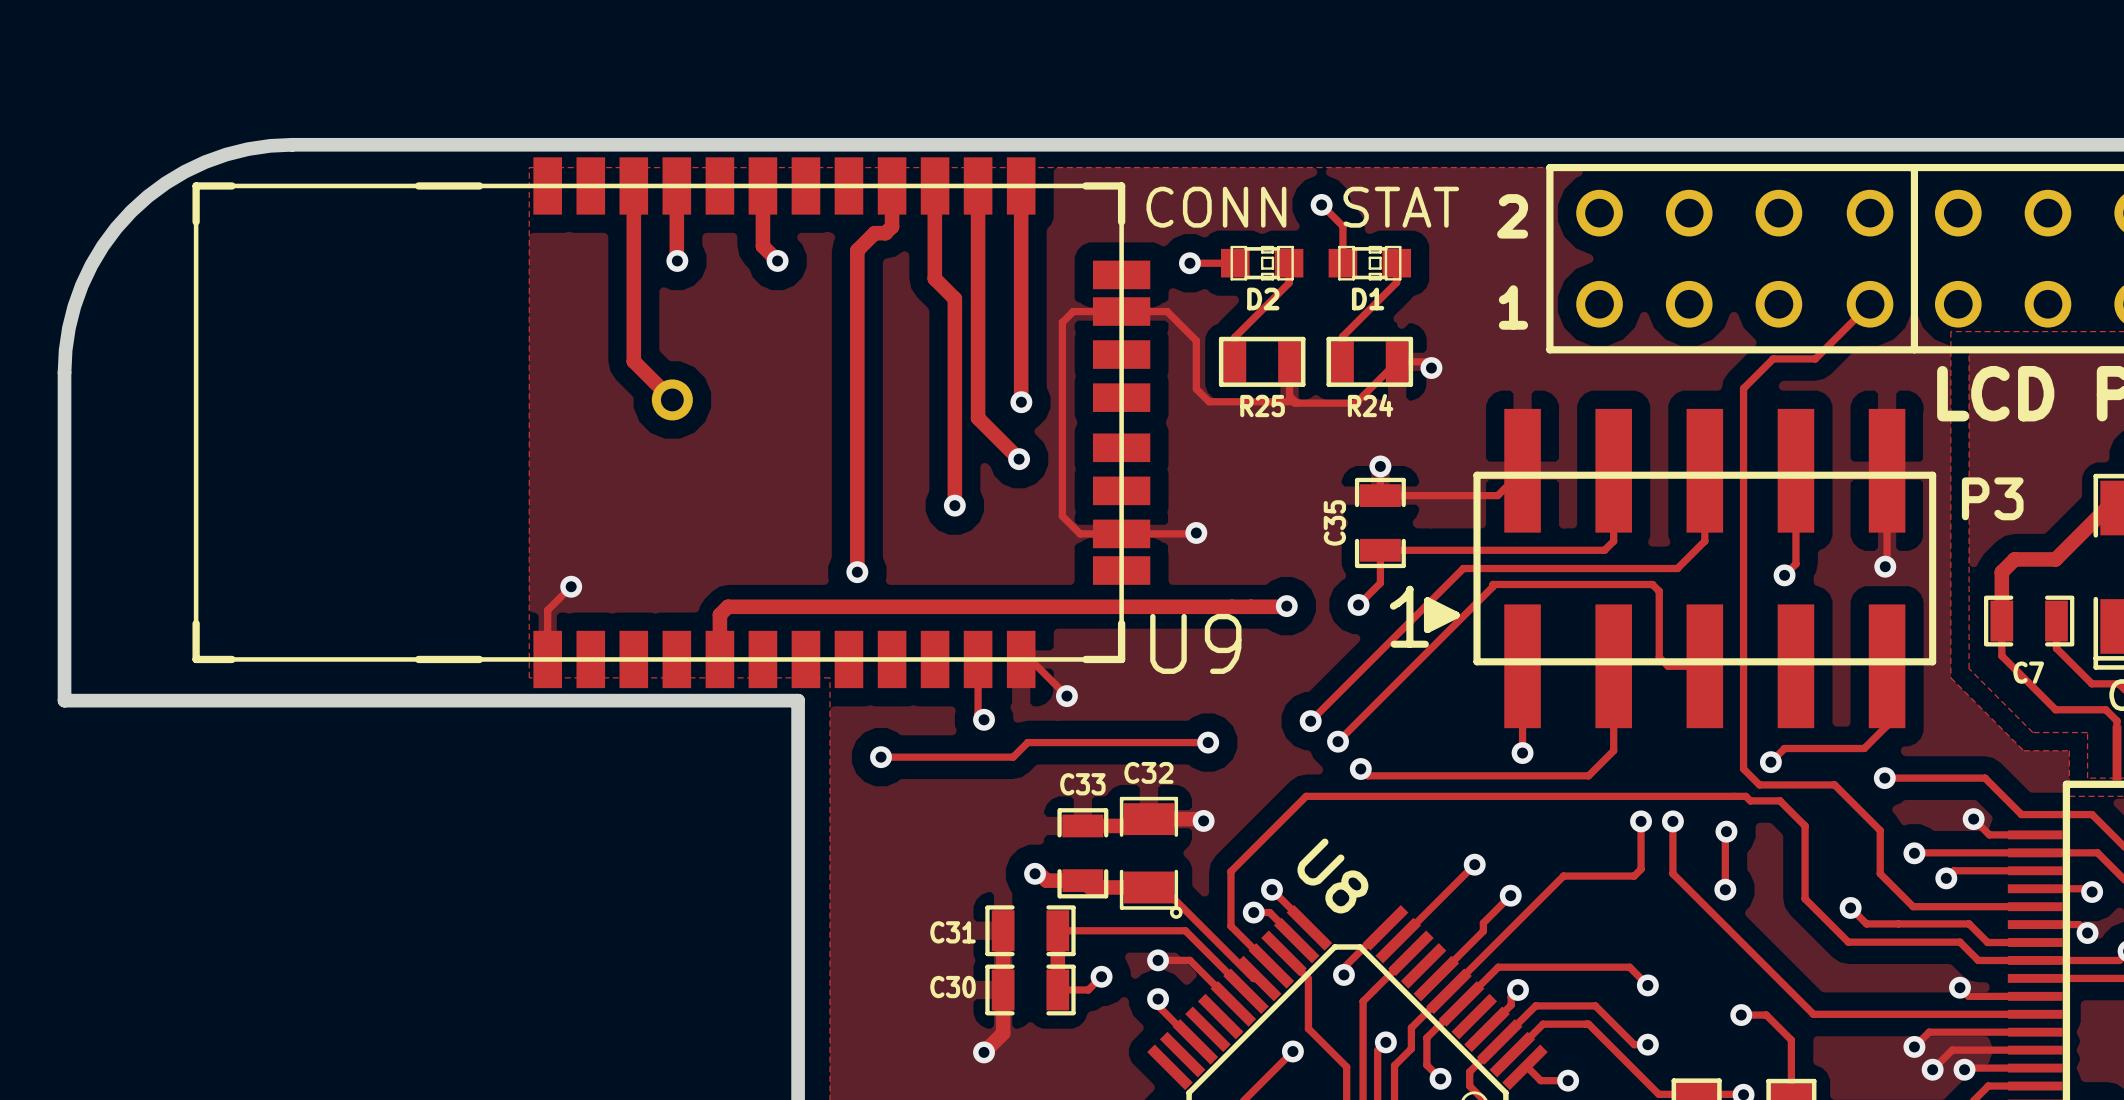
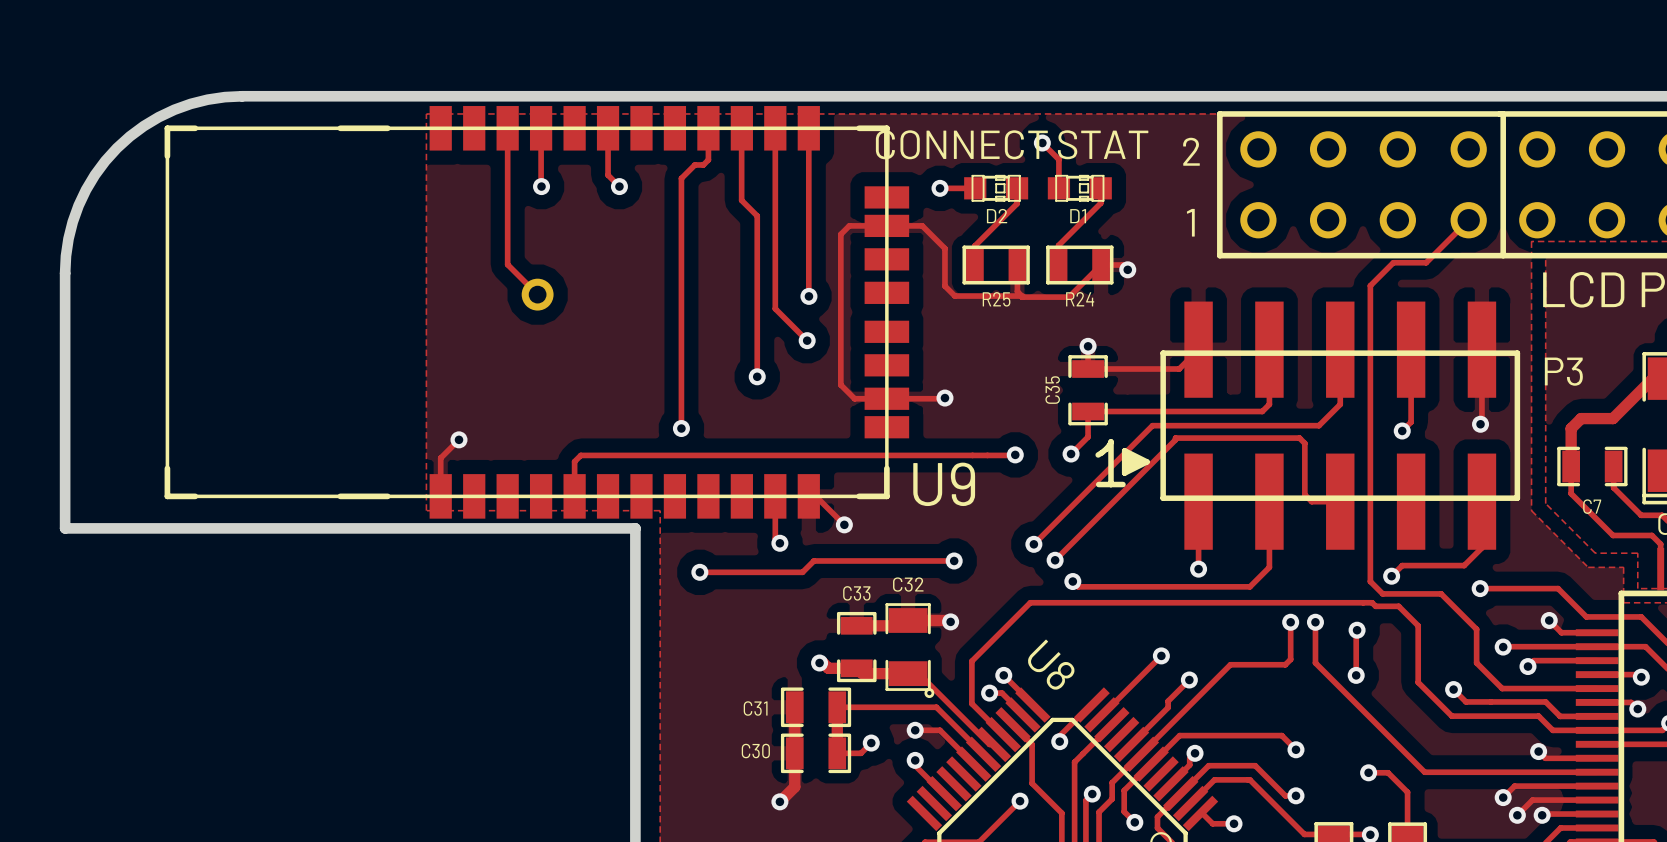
track width: thick (633, 185) (633, 361) (672, 399) -> thin (507, 128) (507, 264) (537, 294)
track width: thick (676, 185) (676, 260) -> thin (541, 128) (541, 186)
track width: thick (762, 185) (762, 246) (777, 260) -> thin (608, 128) (608, 175) (619, 186)
track width: thick (892, 185) (892, 226) (885, 233) (874, 233) (857, 250) (857, 572) -> thin (708, 128) (708, 159) (703, 164) (694, 164) (681, 178) (681, 428)
track width: thick (978, 185) (978, 418) (1019, 459) -> thin (775, 128) (775, 308) (807, 340)
track width: thick (1021, 185) (1021, 402) -> thin (808, 128) (808, 296)
track width: thick (934, 186) (934, 278) (954, 298) (954, 505) -> thin (741, 128) (741, 200) (757, 215) (757, 376)
D2 value: CONN (1216, 207) -> CONNECT (961, 144)
track width: thick (1286, 606) (727, 606) (719, 614) (719, 659) -> thin (1014, 455) (580, 455) (574, 461) (574, 496)

